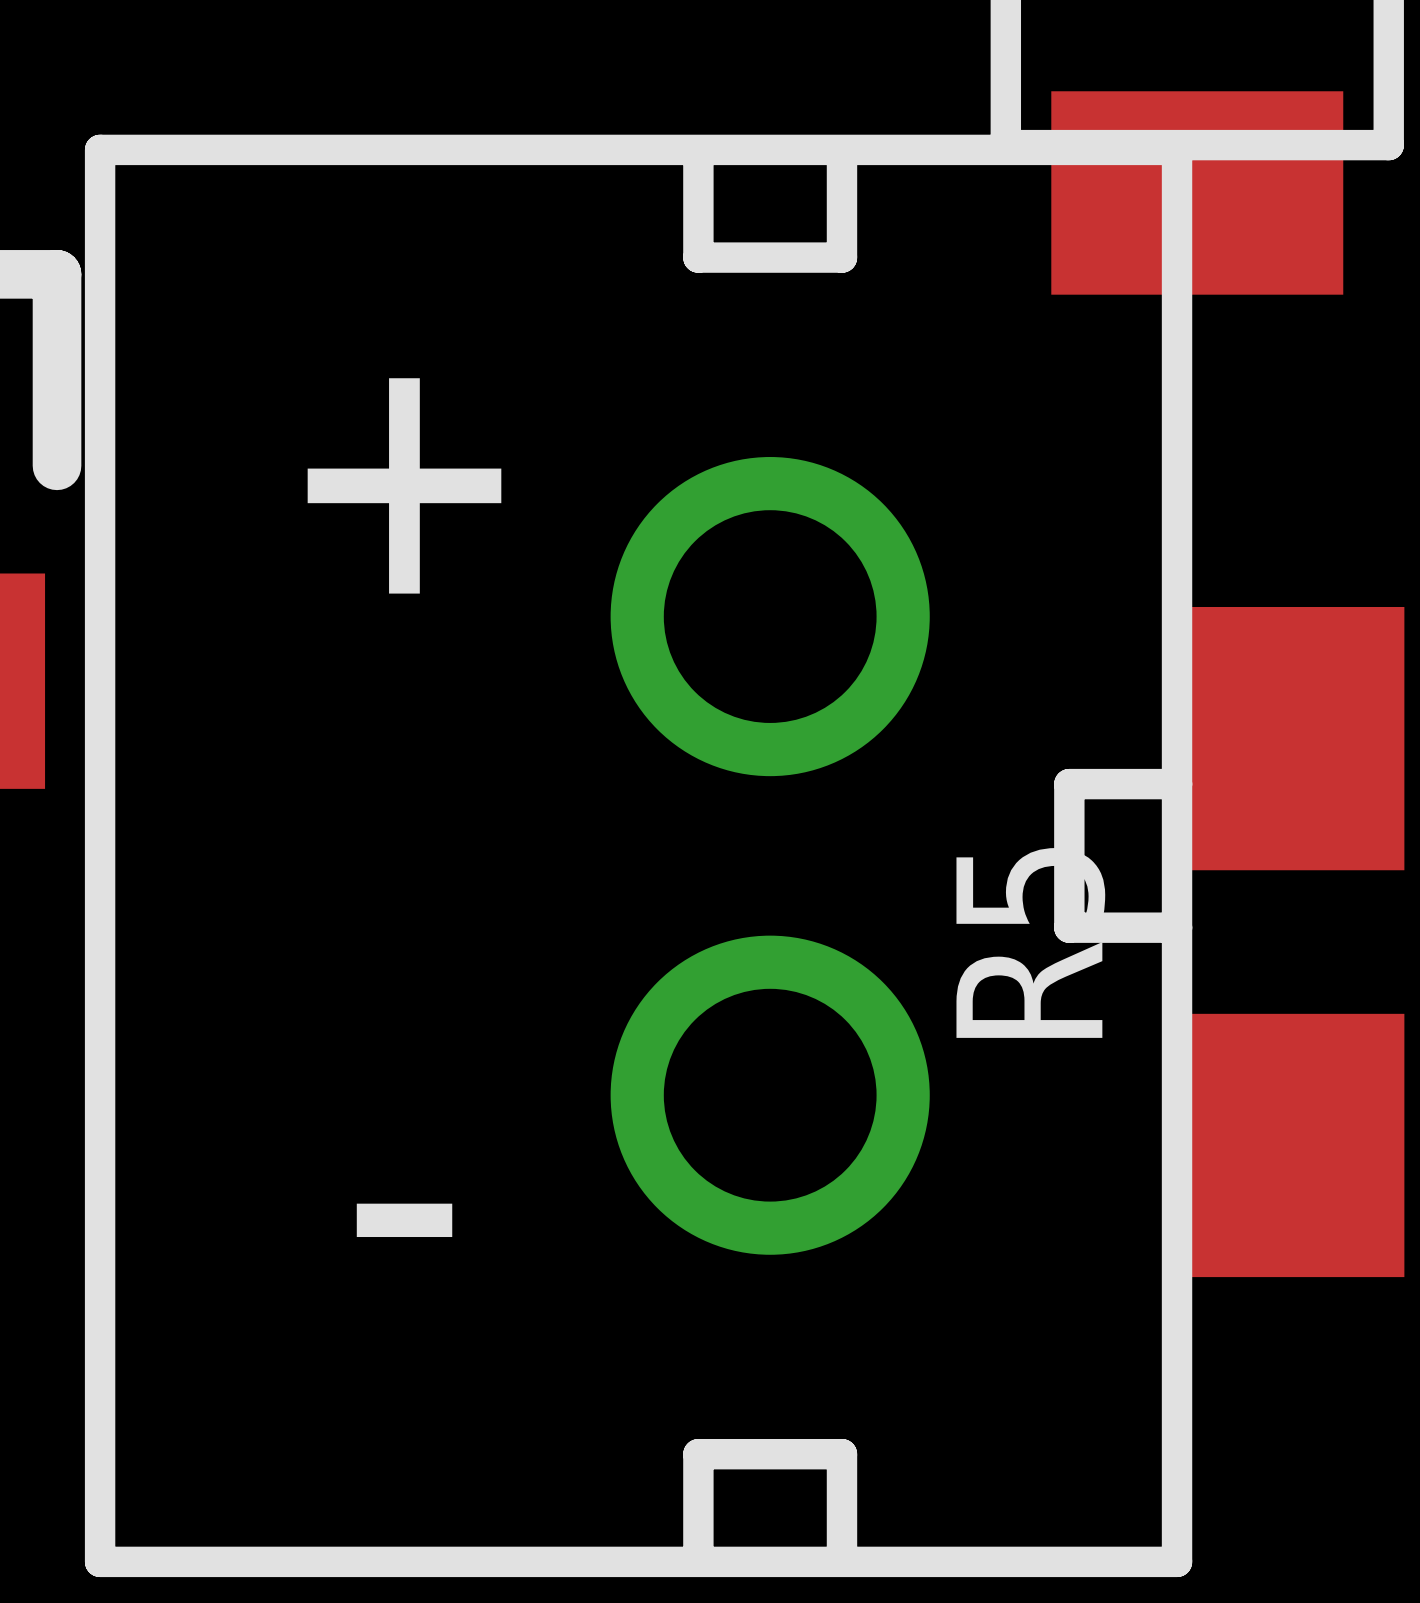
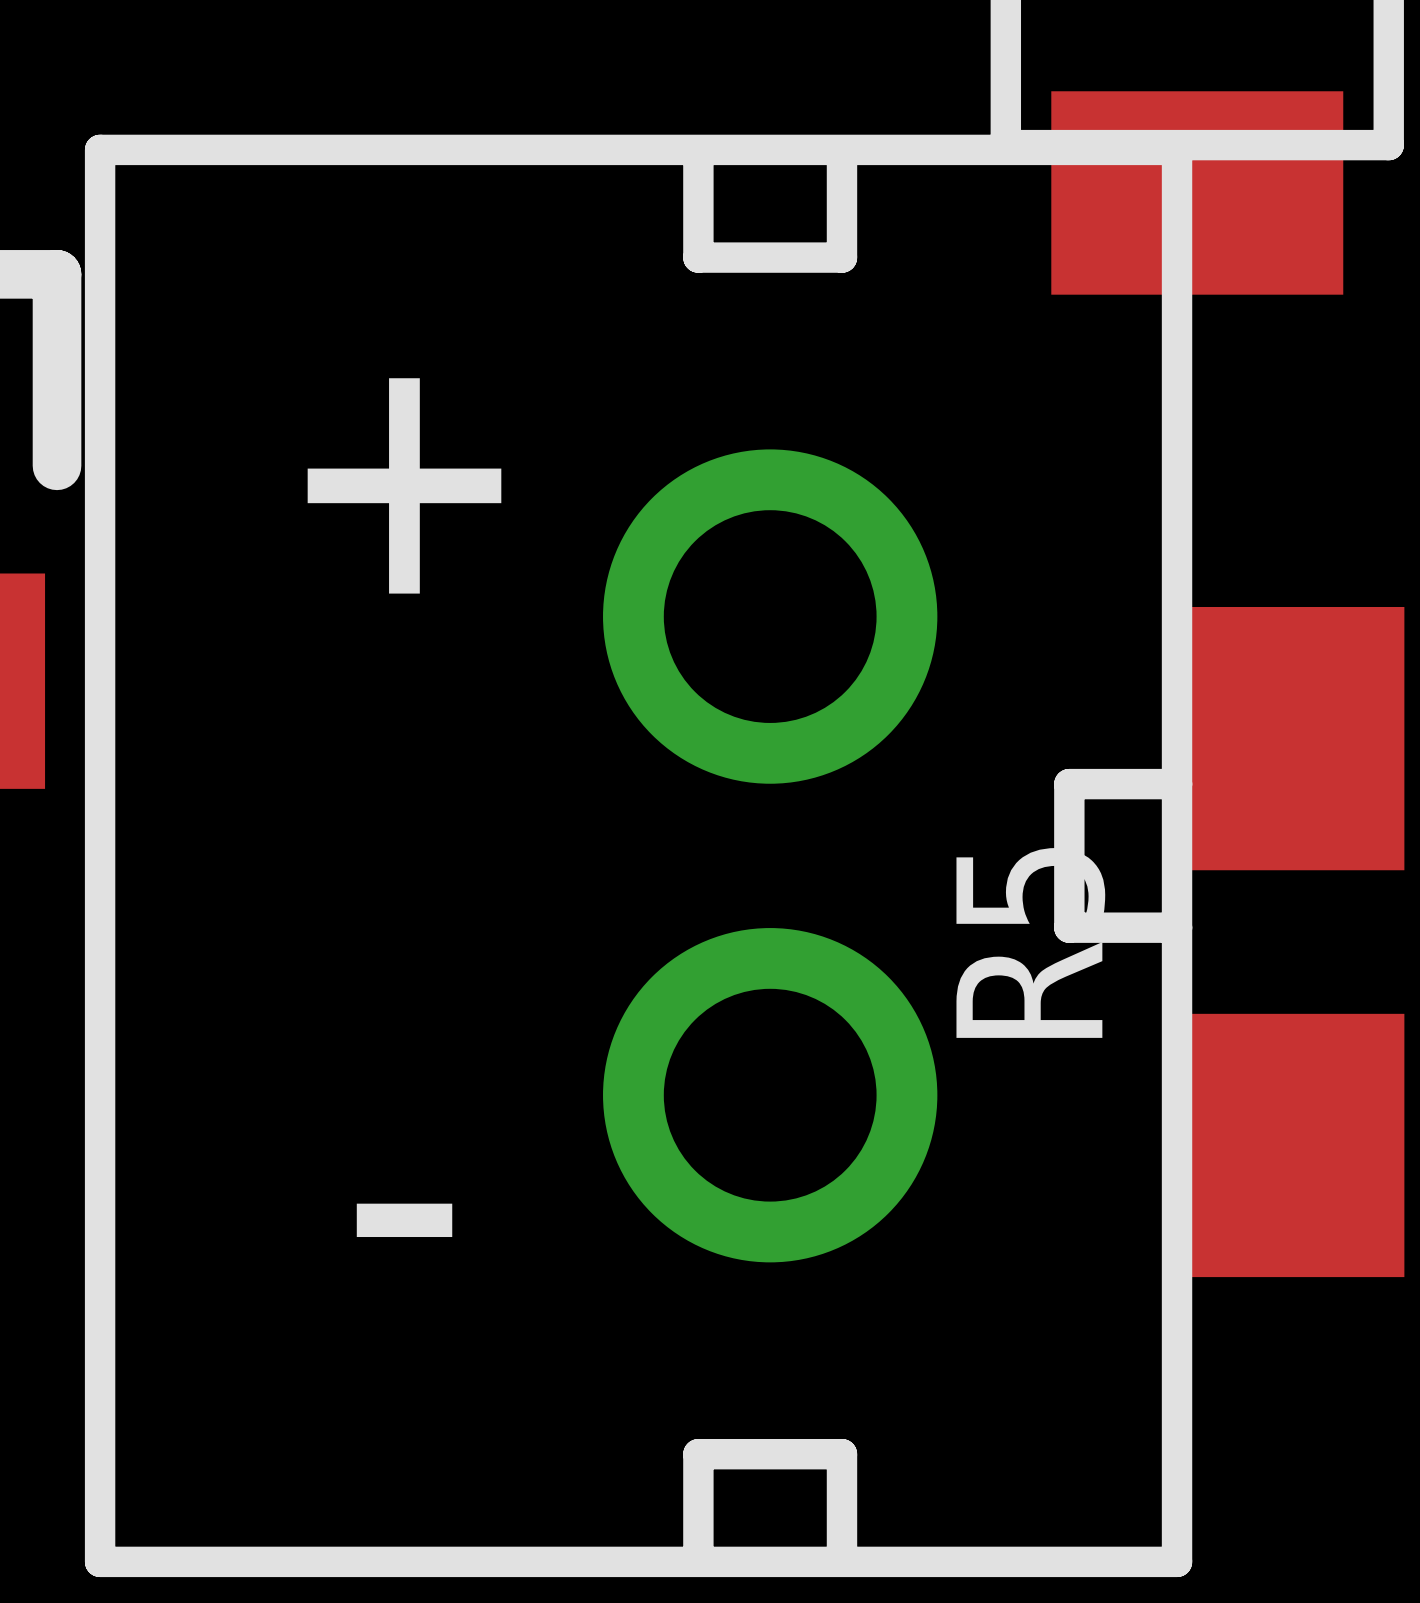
part footprint: [84, 134, 1193, 1578] -> [84, 134, 1193, 1578]

